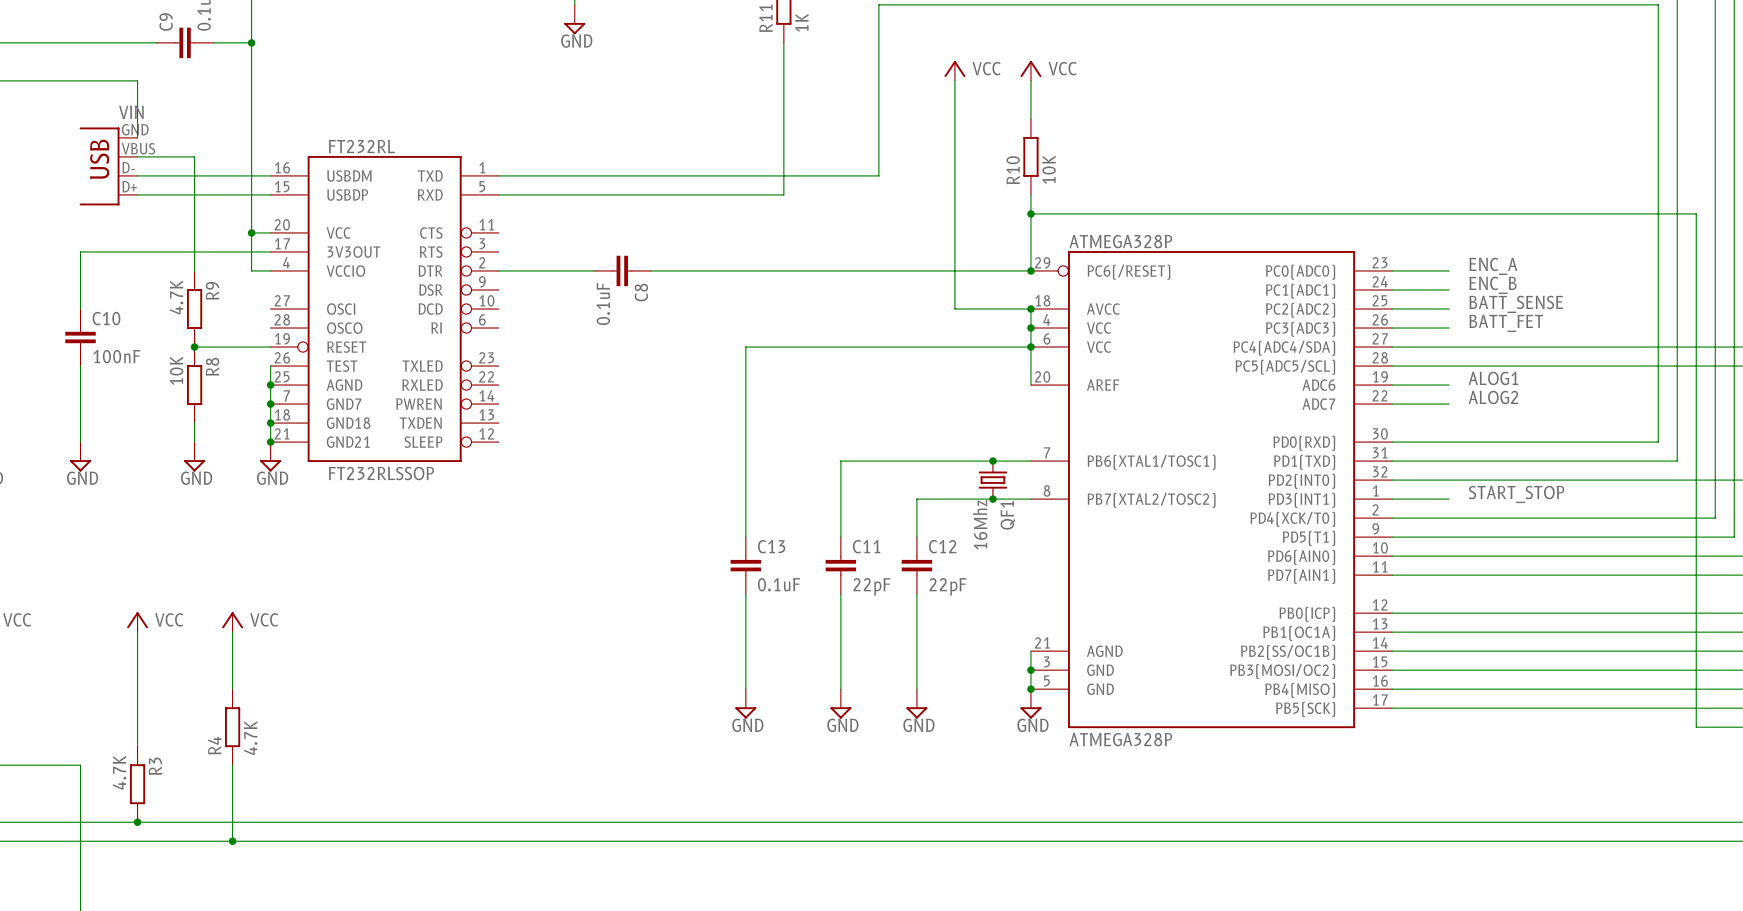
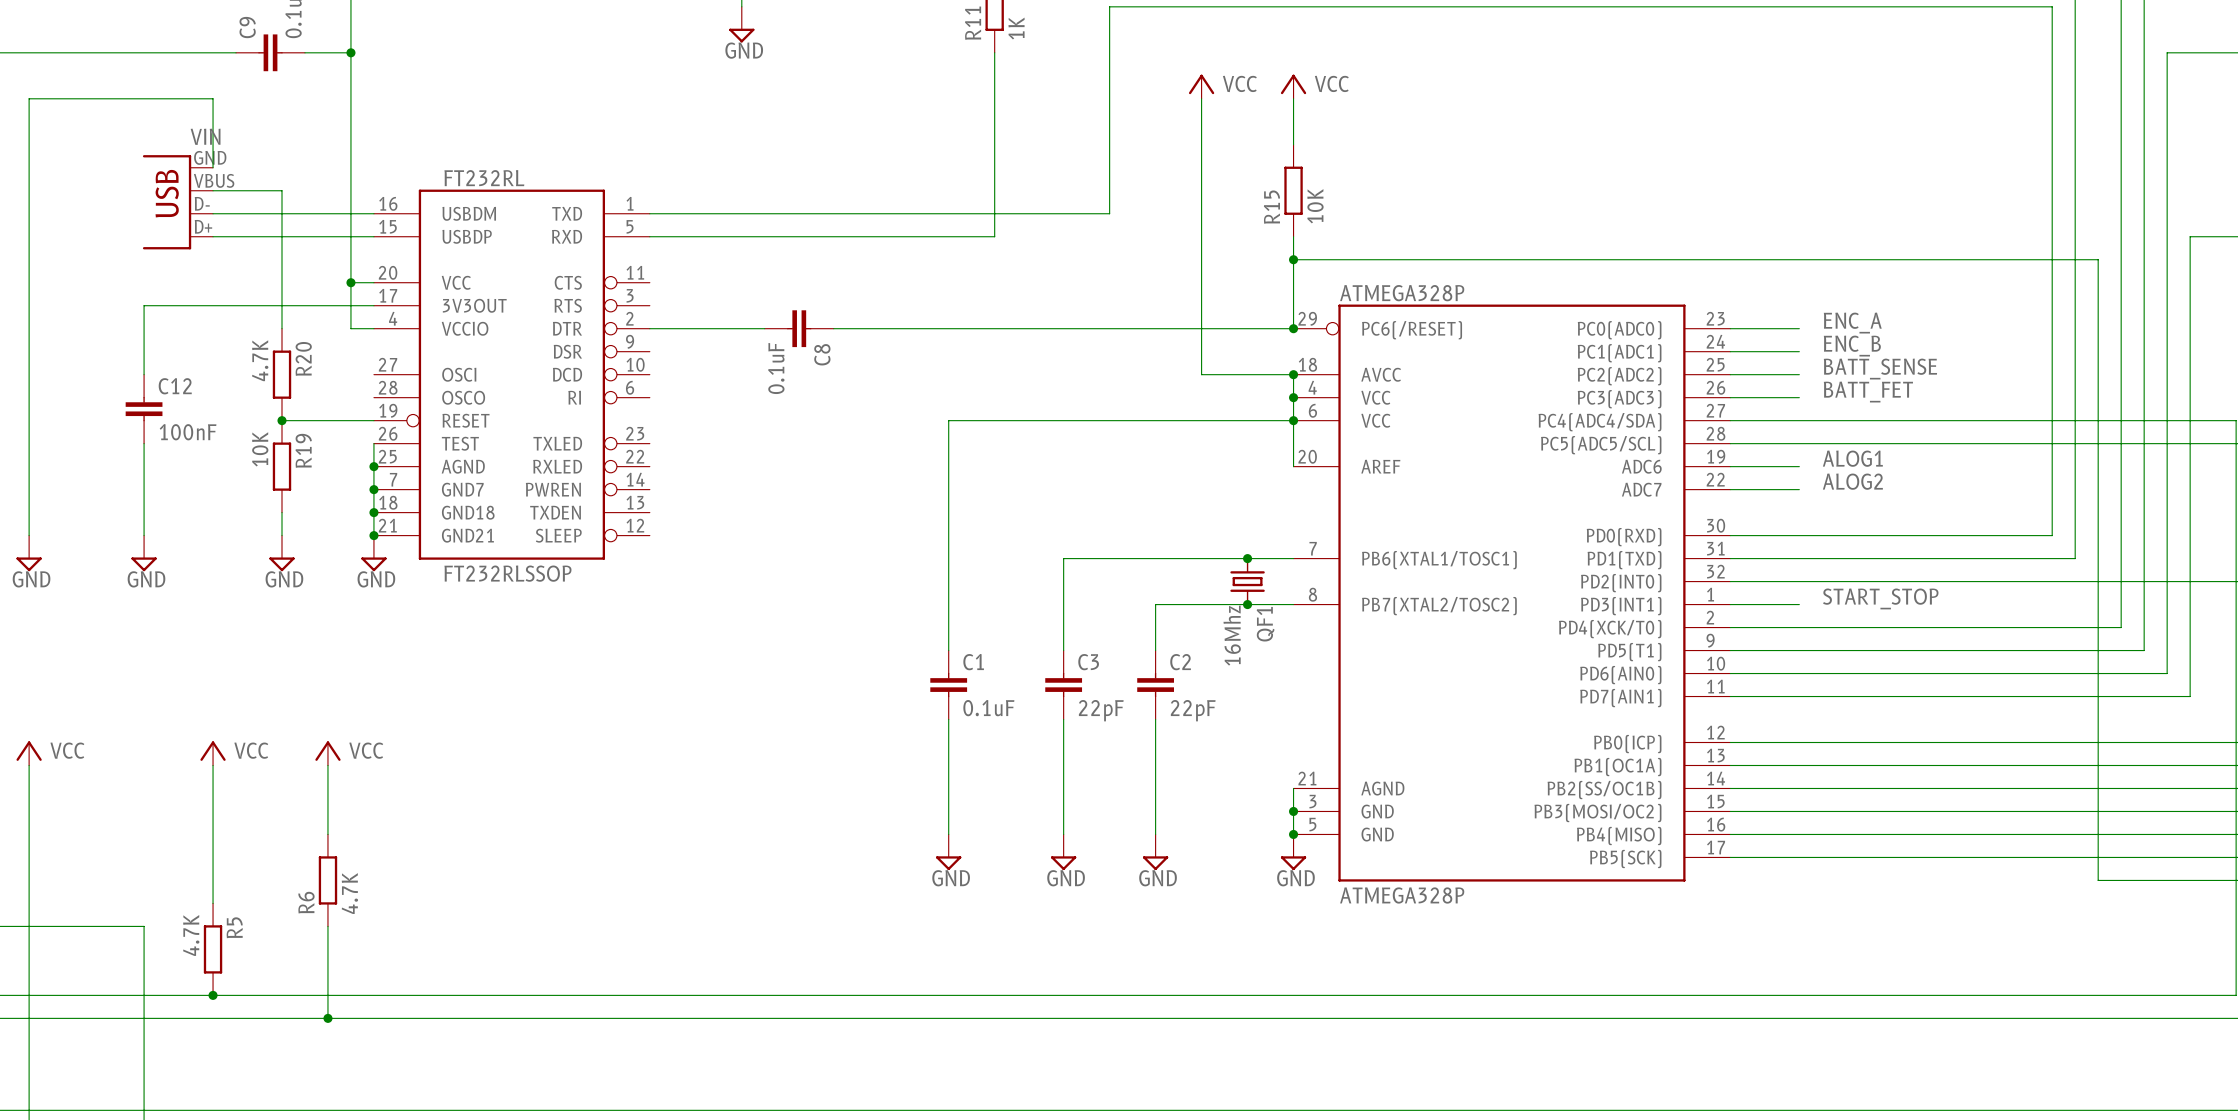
R10 name: R10 (1013, 170) -> R15 (1271, 207)
R9 name: R9 (212, 290) -> R20 (303, 358)
C10 name: C10 (106, 318) -> C12 (175, 386)
R8 name: R8 (212, 366) -> R19 (303, 450)
C13 name: C13 (771, 546) -> C1 (973, 662)
C11 name: C11 (866, 546) -> C3 (1088, 662)
C12 name: C12 (942, 546) -> C2 (1180, 662)
R4 name: R4 (214, 745) -> R6 (306, 902)
R3 name: R3 (155, 766) -> R5 (234, 927)

